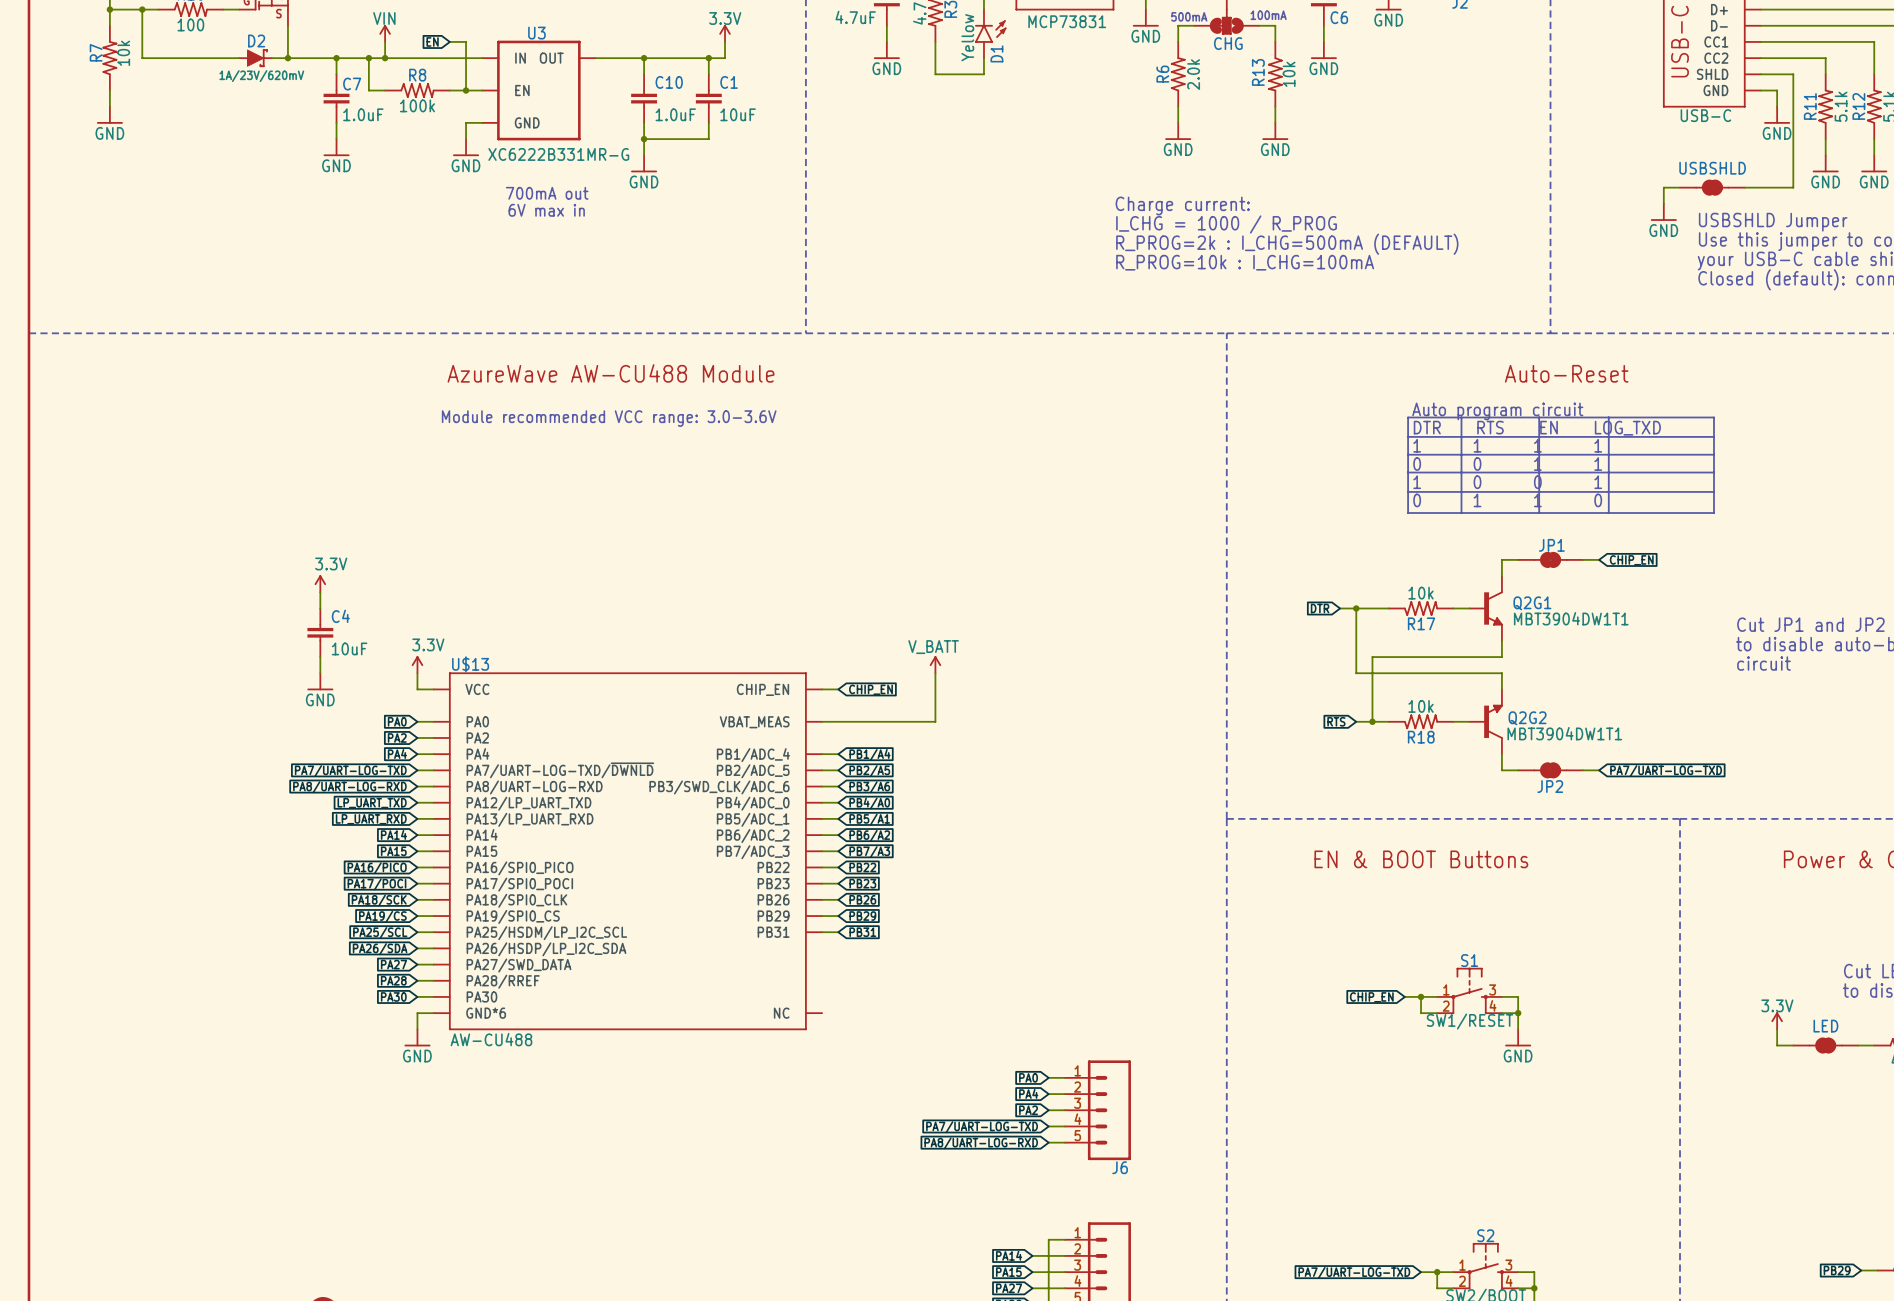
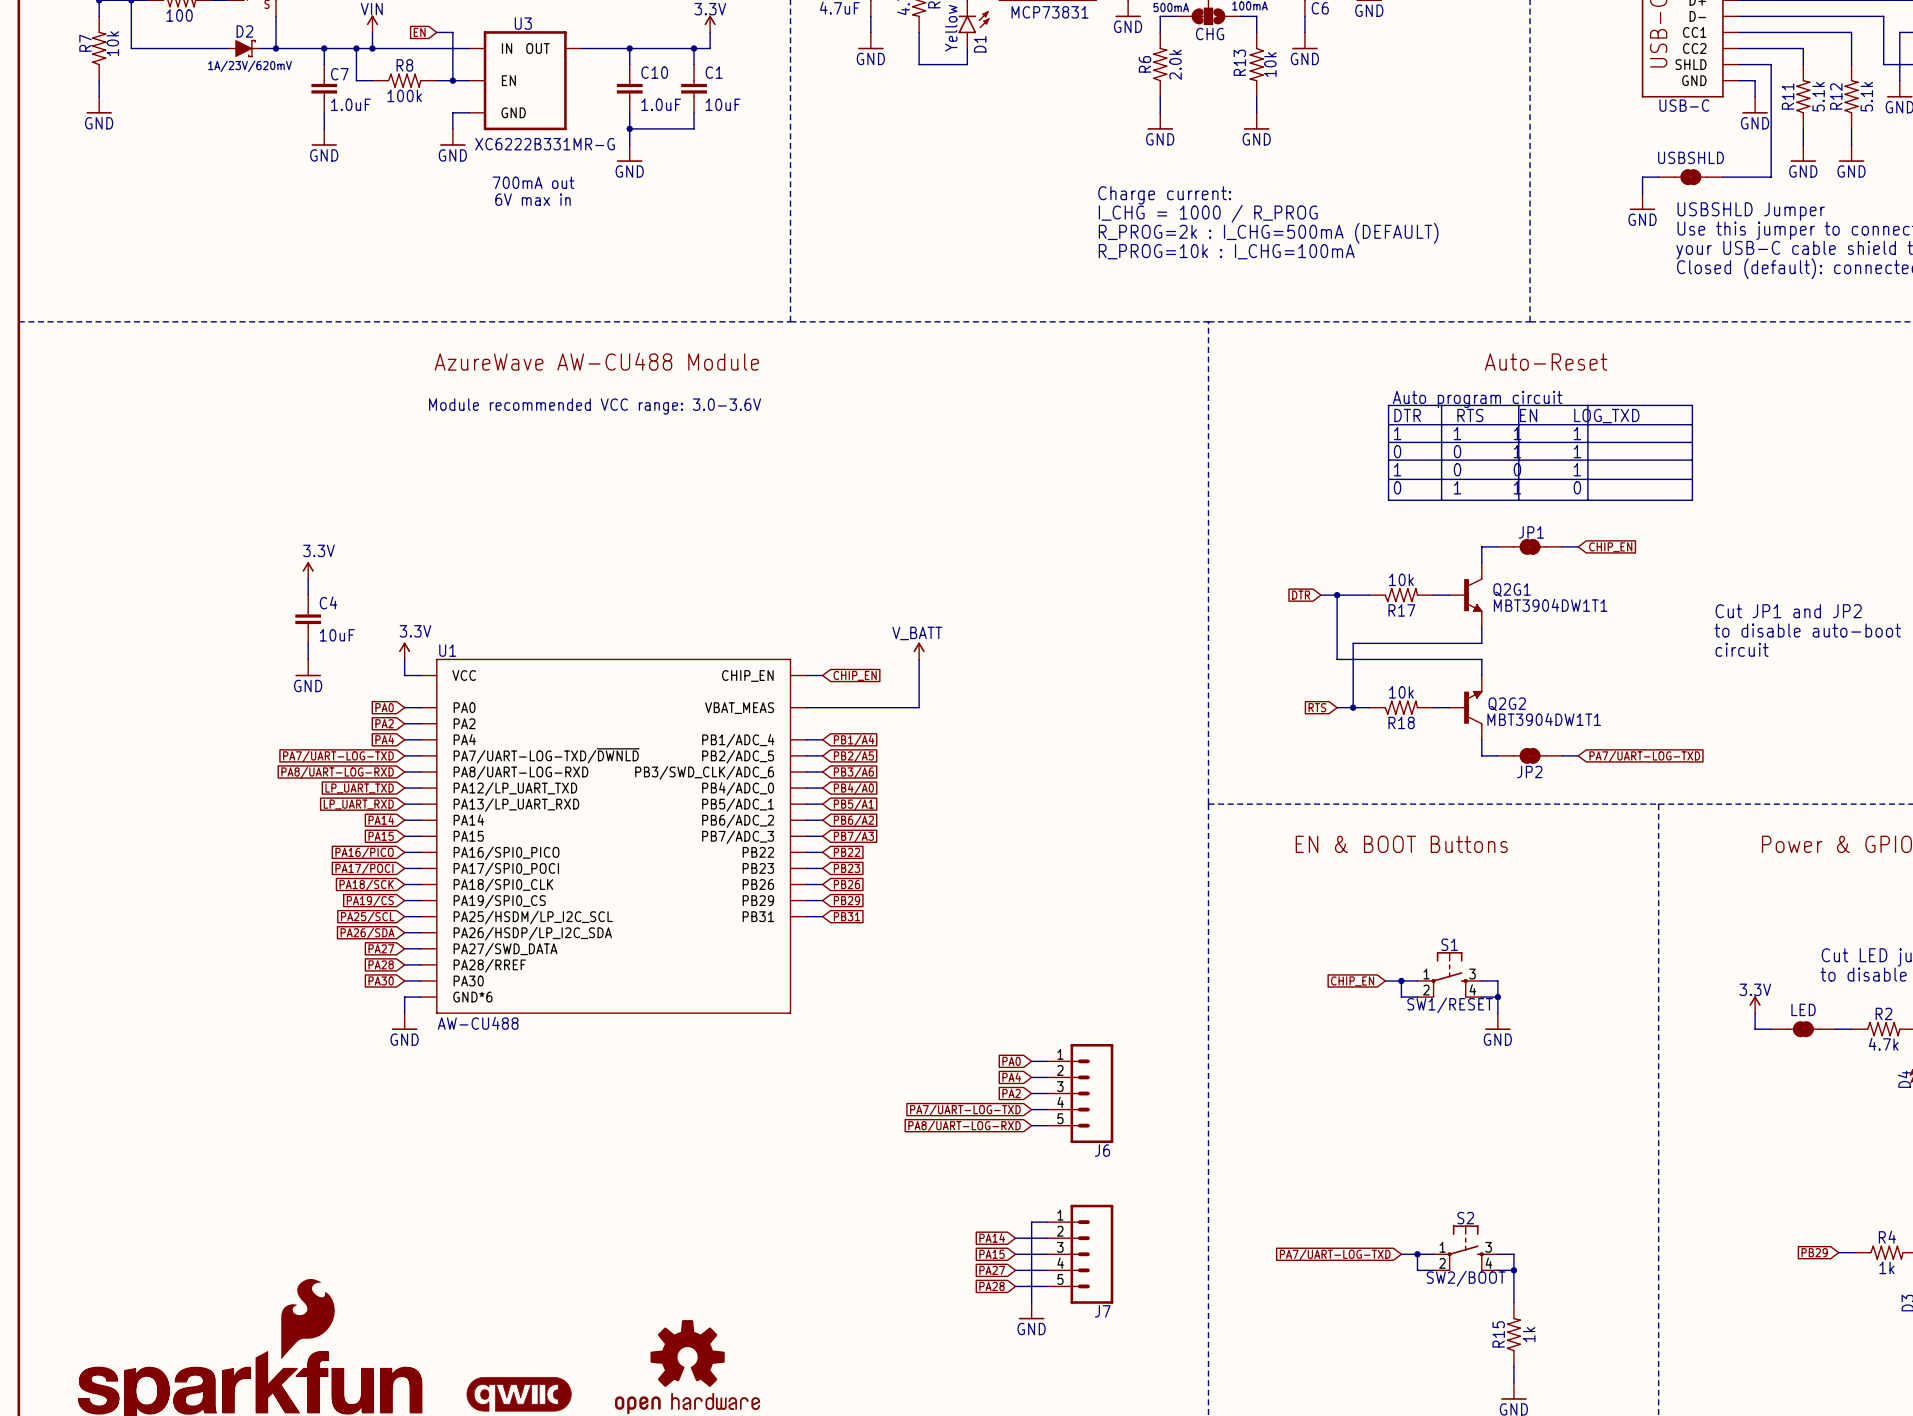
U$13: AW-CU488 (627, 851) -> none
U1: none -> AW-CU488 (613, 836)

